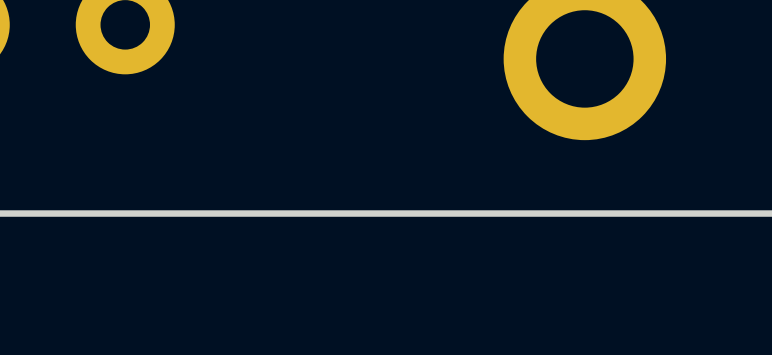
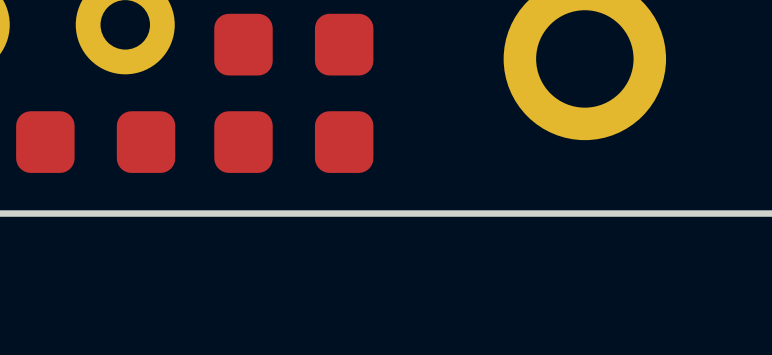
part: none -> (293, 44)
part: none -> (95, 142)
part: none -> (293, 142)

